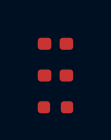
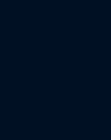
part: (55, 43) -> none
part: (55, 75) -> none
part: (55, 107) -> none

